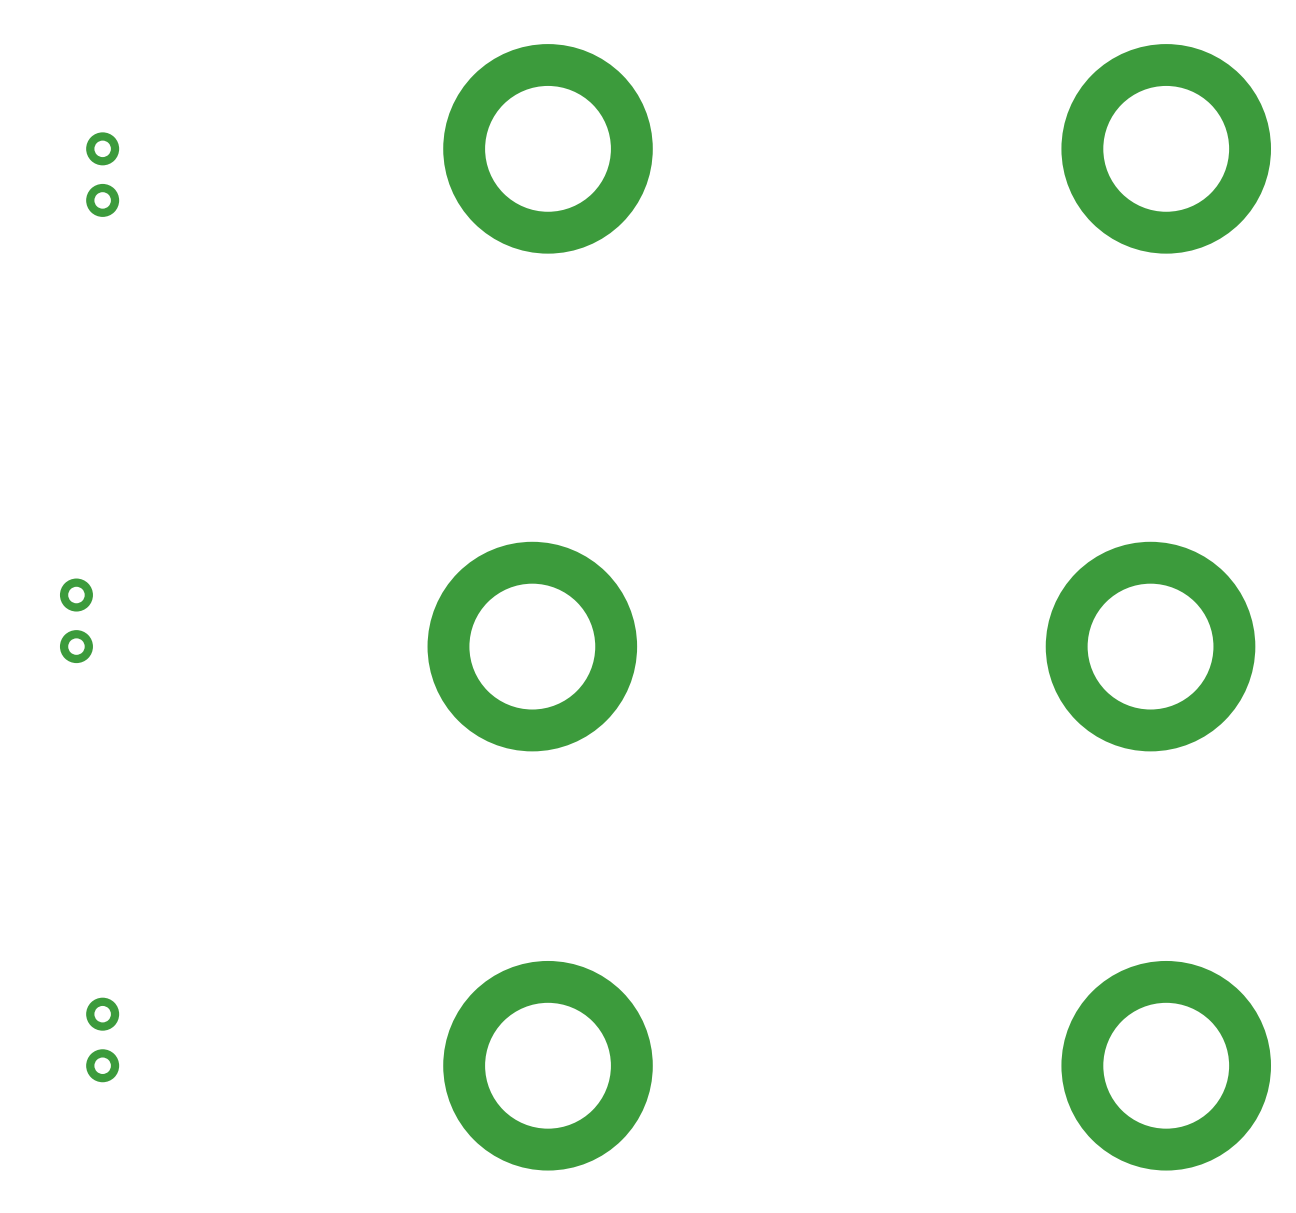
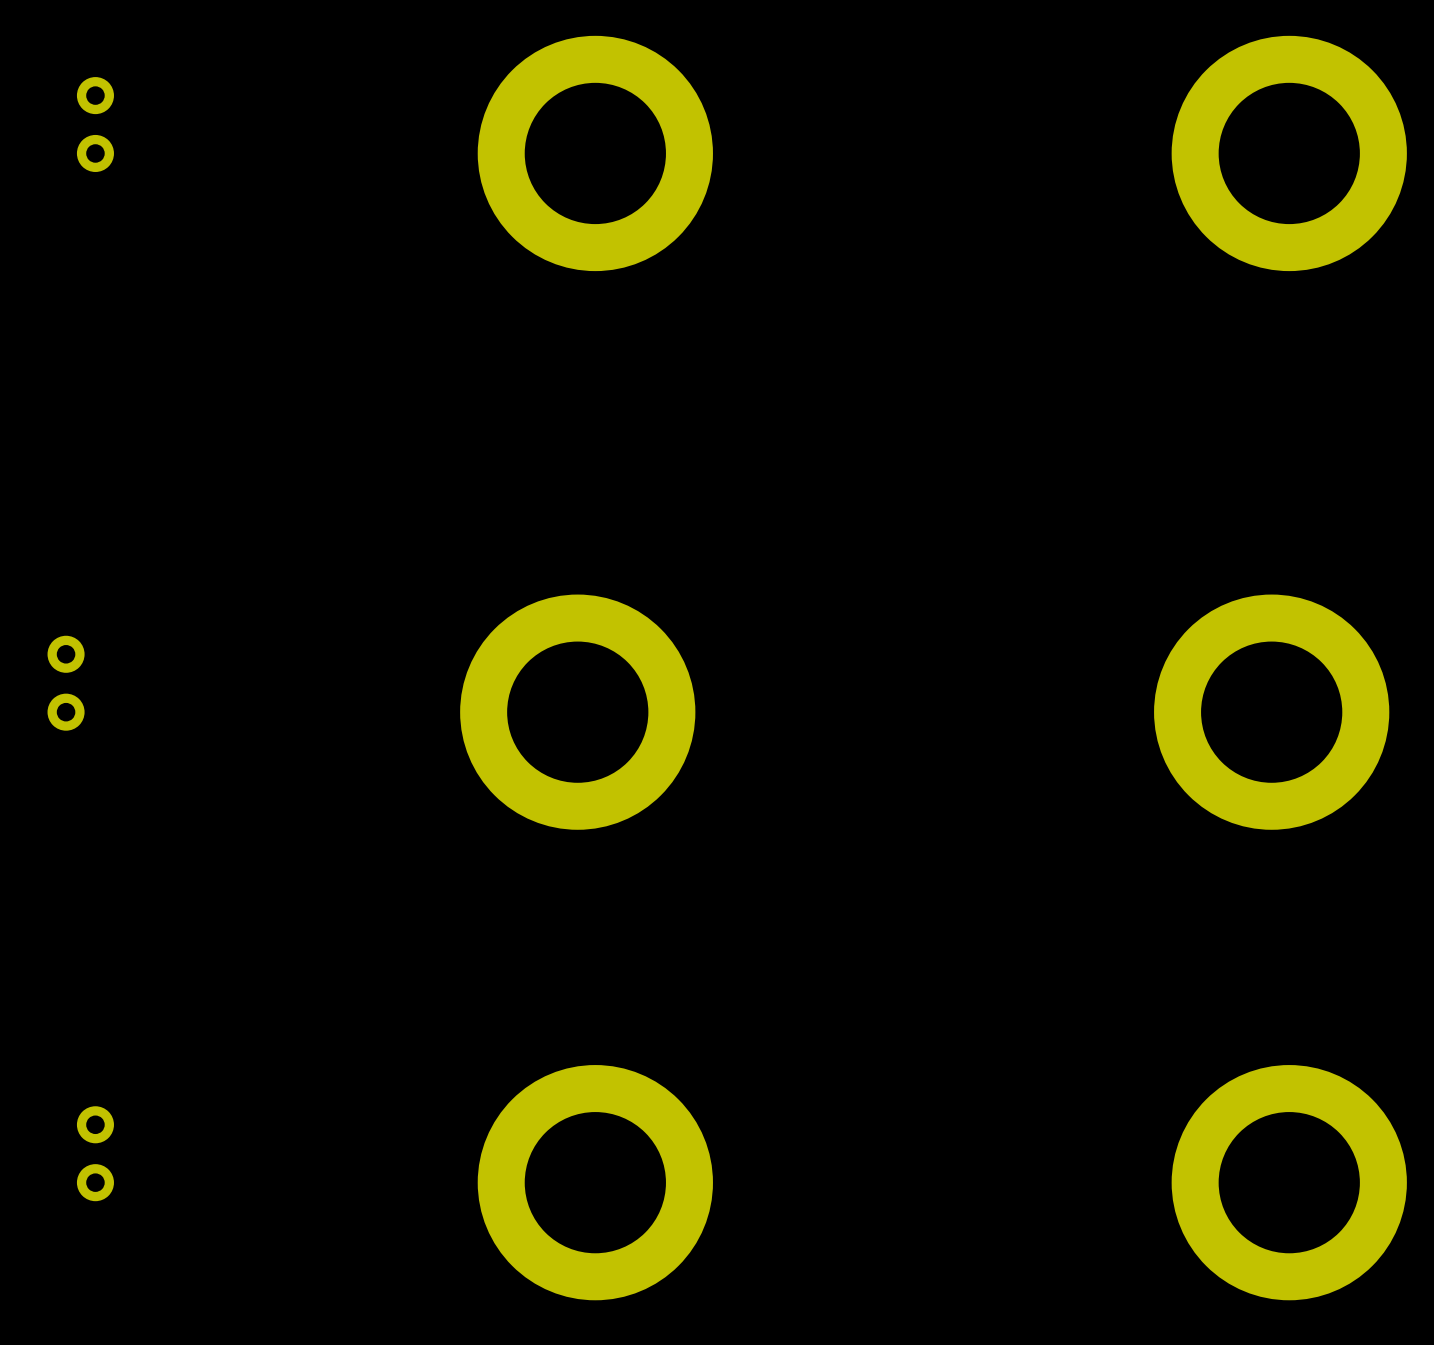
part position: (102, 174) -> (95, 124)

